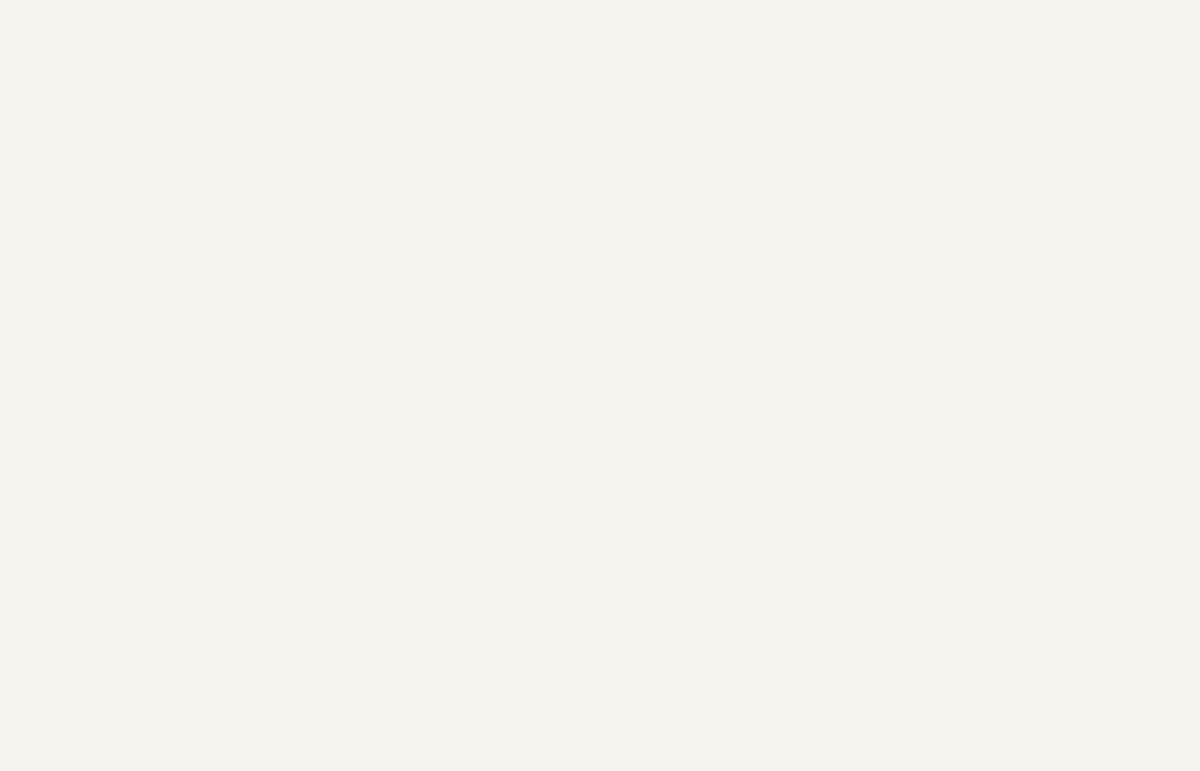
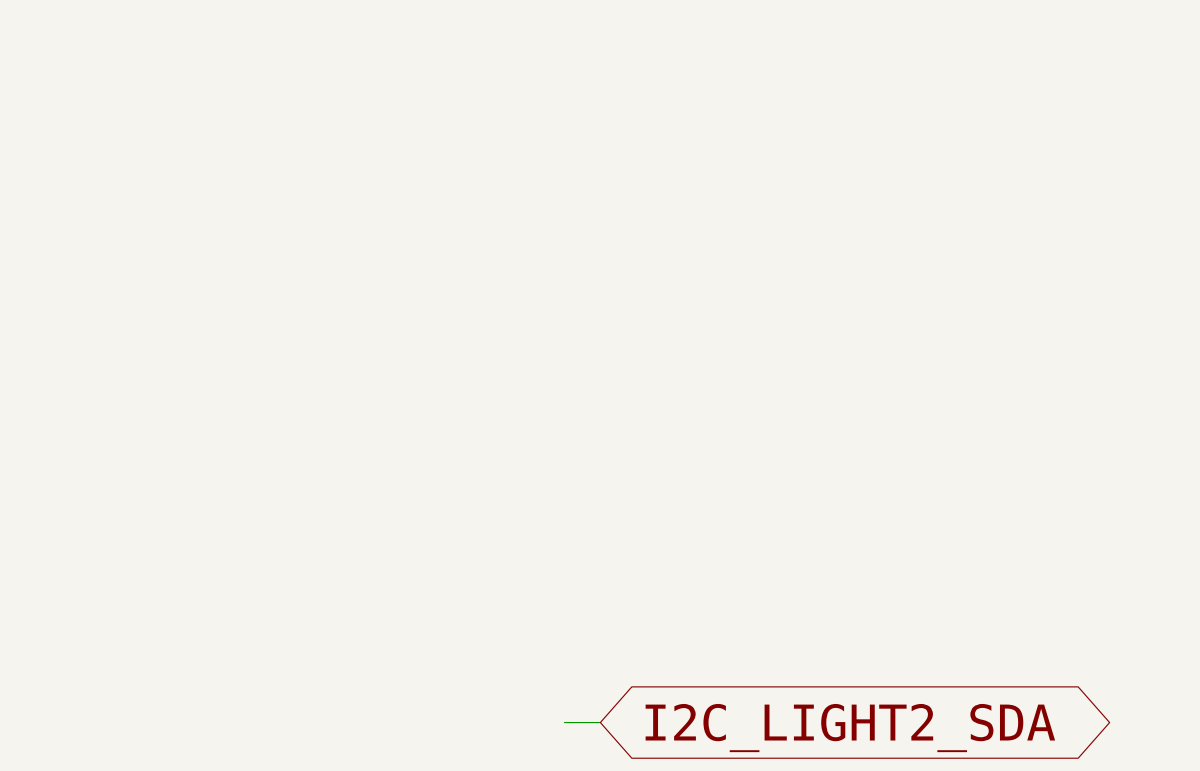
wire: none -> (564, 722) (600, 722)
global label: none -> I2C_LIGHT2_SDA (850, 728)

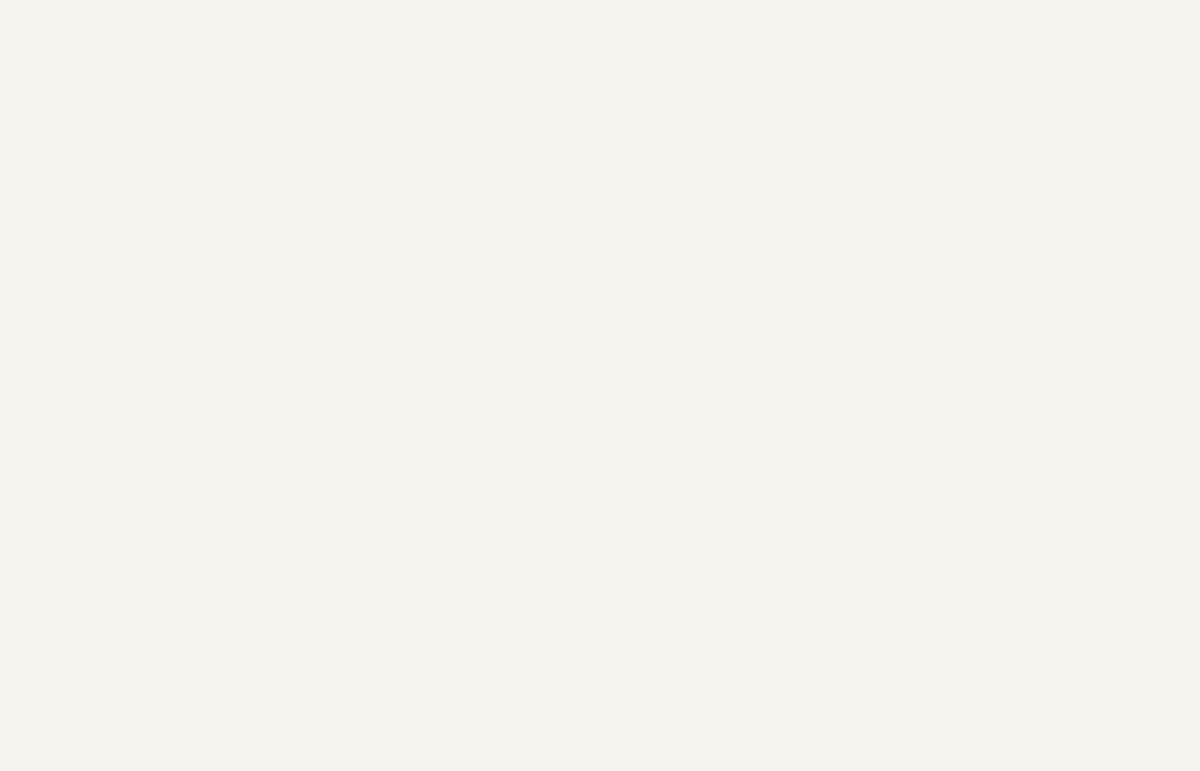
wire: (564, 722) (600, 722) -> none
global label: I2C_LIGHT2_SDA (850, 728) -> none

